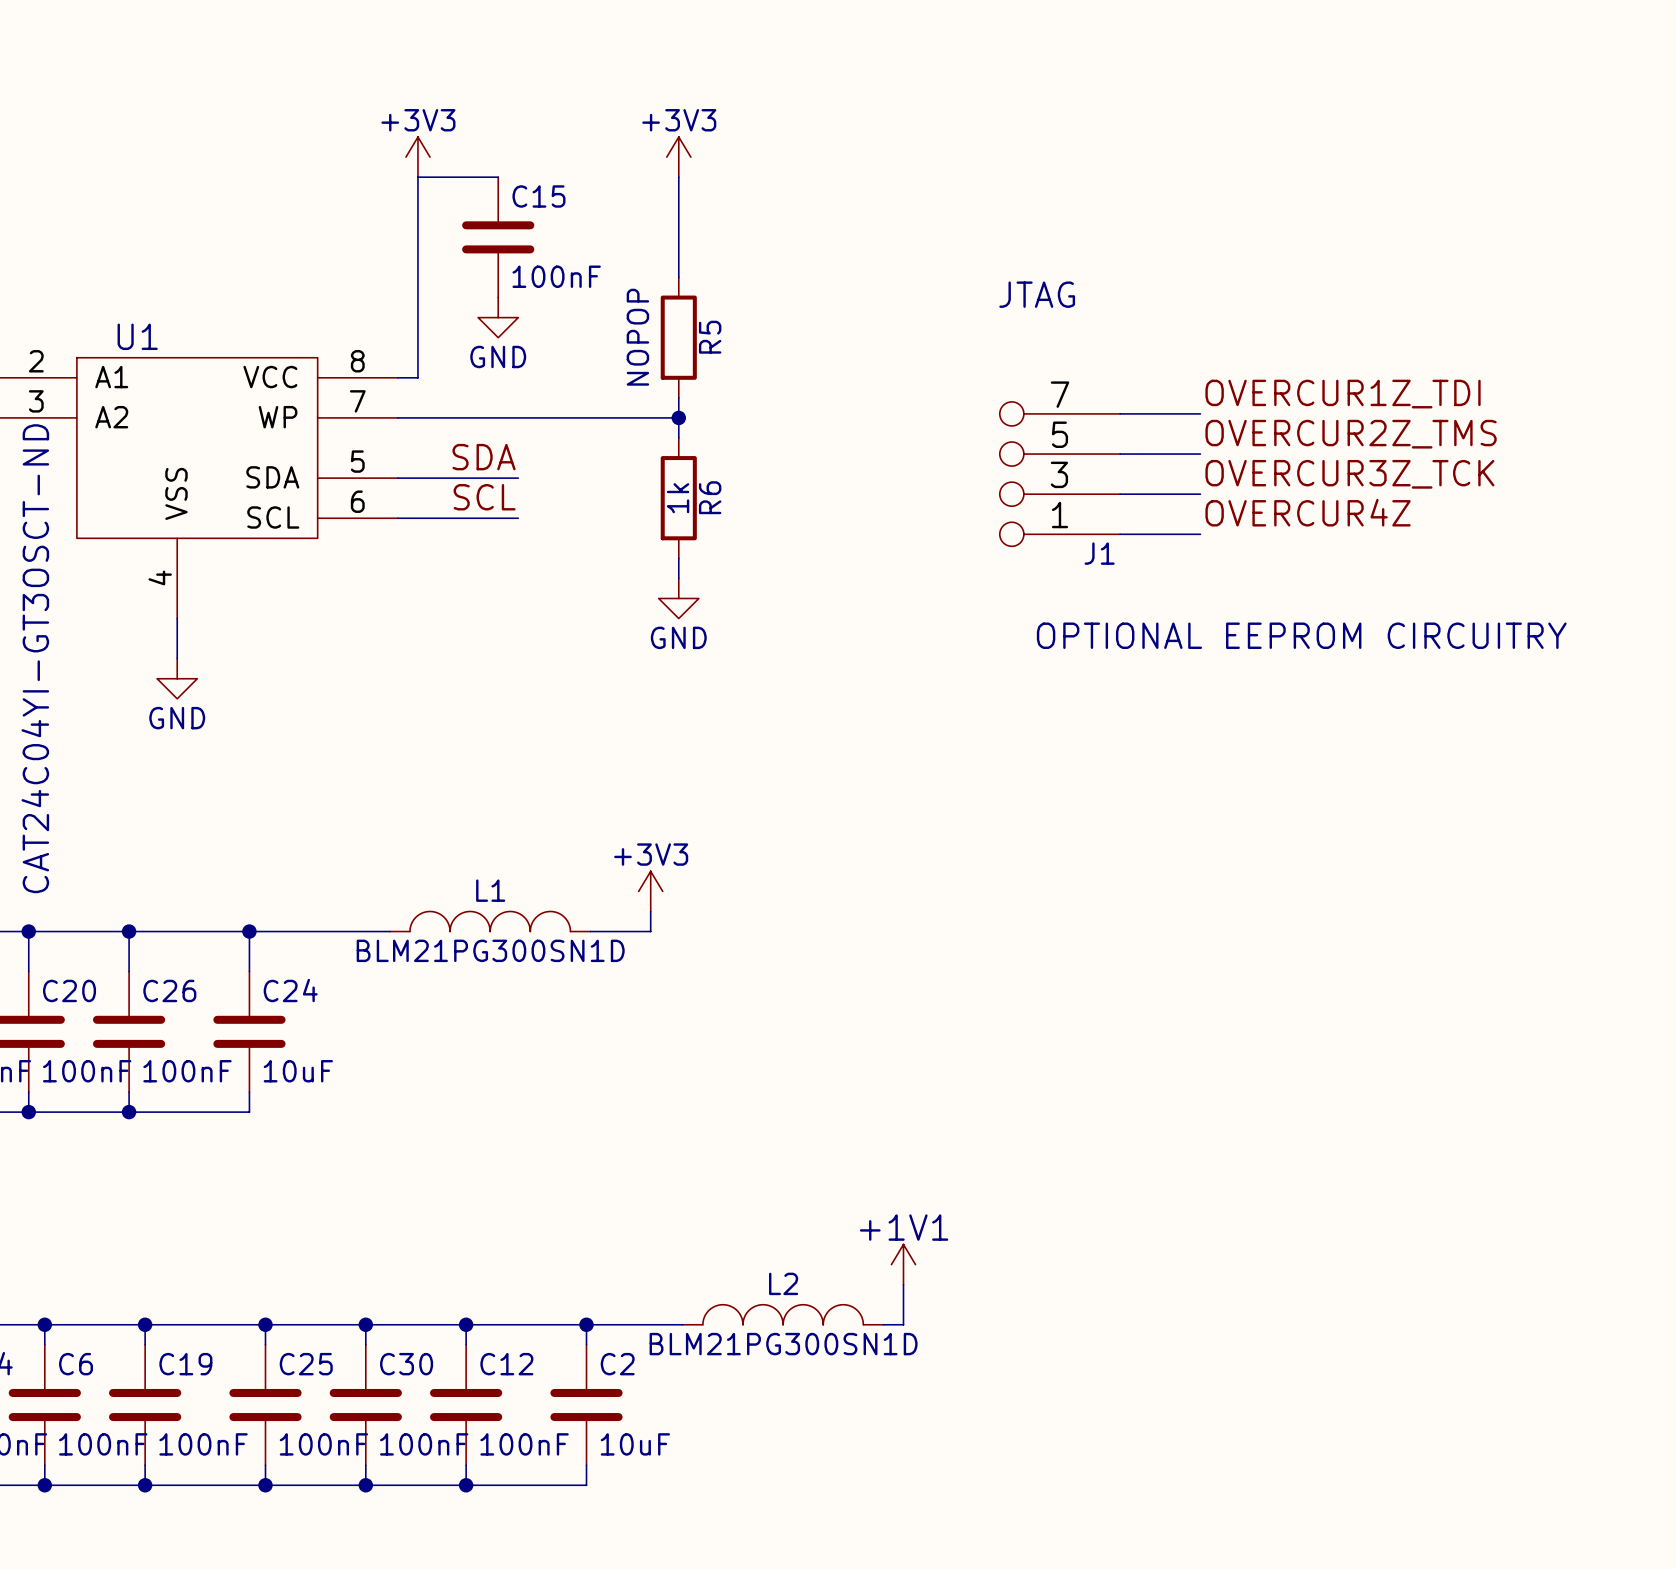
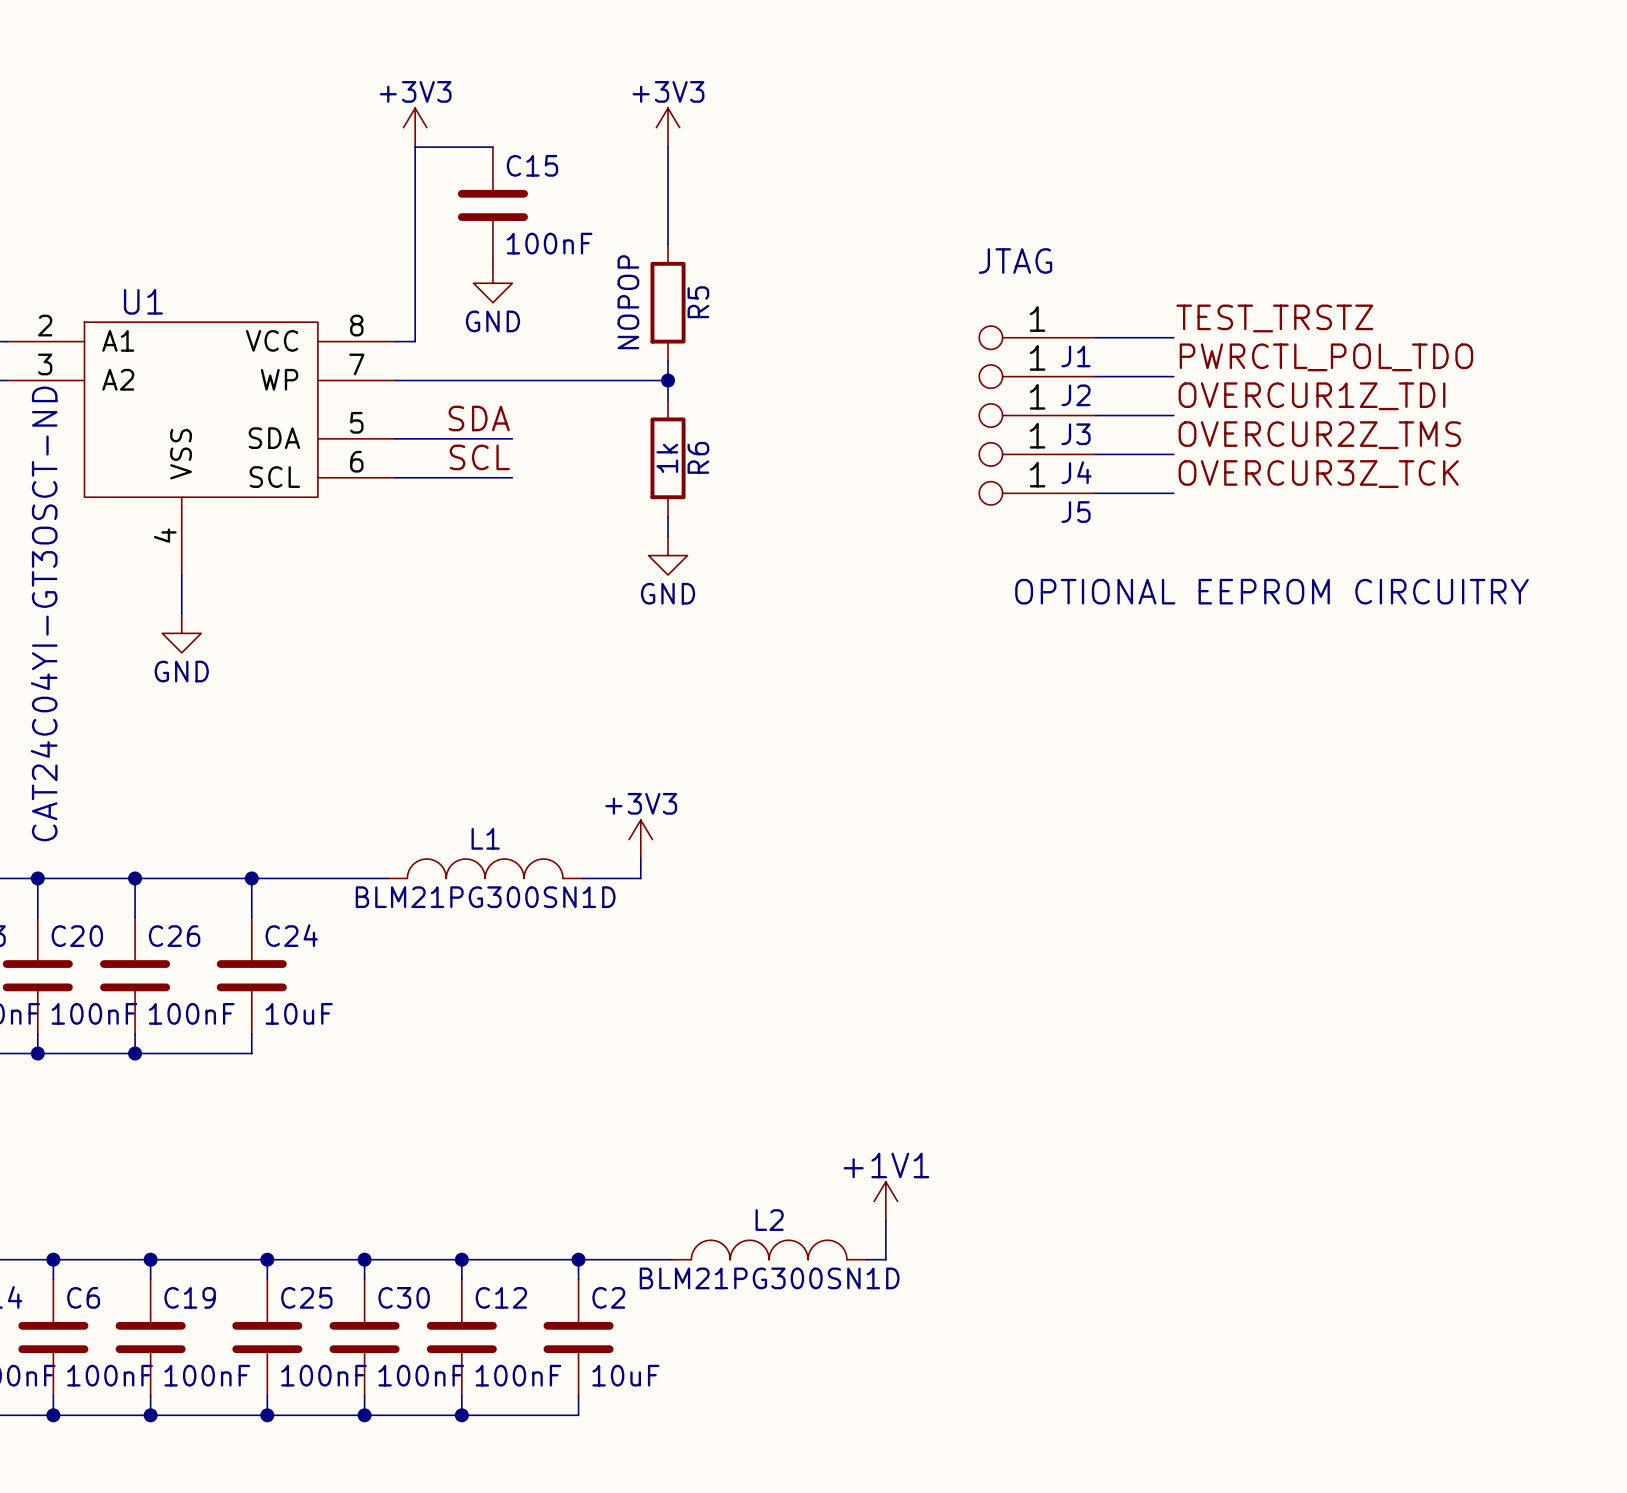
label: none -> TEST_TRSTZ (1274, 318)
wire: none -> (1095, 337) (1173, 337)
label: OVERCUR1Z_TDI (1343, 394) -> PWRCTL_POL_TDO (1326, 357)
J1 symbol: [999, 401, 1121, 547] -> [979, 326, 1096, 350]
J2: none -> (1037, 376)
label: OVERCUR2Z_TMS (1351, 434) -> OVERCUR1Z_TDI (1311, 396)
J3: none -> (1037, 415)
label: OVERCUR3Z_TCK (1349, 474) -> OVERCUR2Z_TMS (1319, 435)
J4: none -> (1037, 454)
label: OVERCUR4Z (1308, 512) -> OVERCUR3Z_TCK (1318, 474)
J5: none -> (1037, 493)
J1 name position: J1 (1099, 553) -> J1 (1076, 356)

